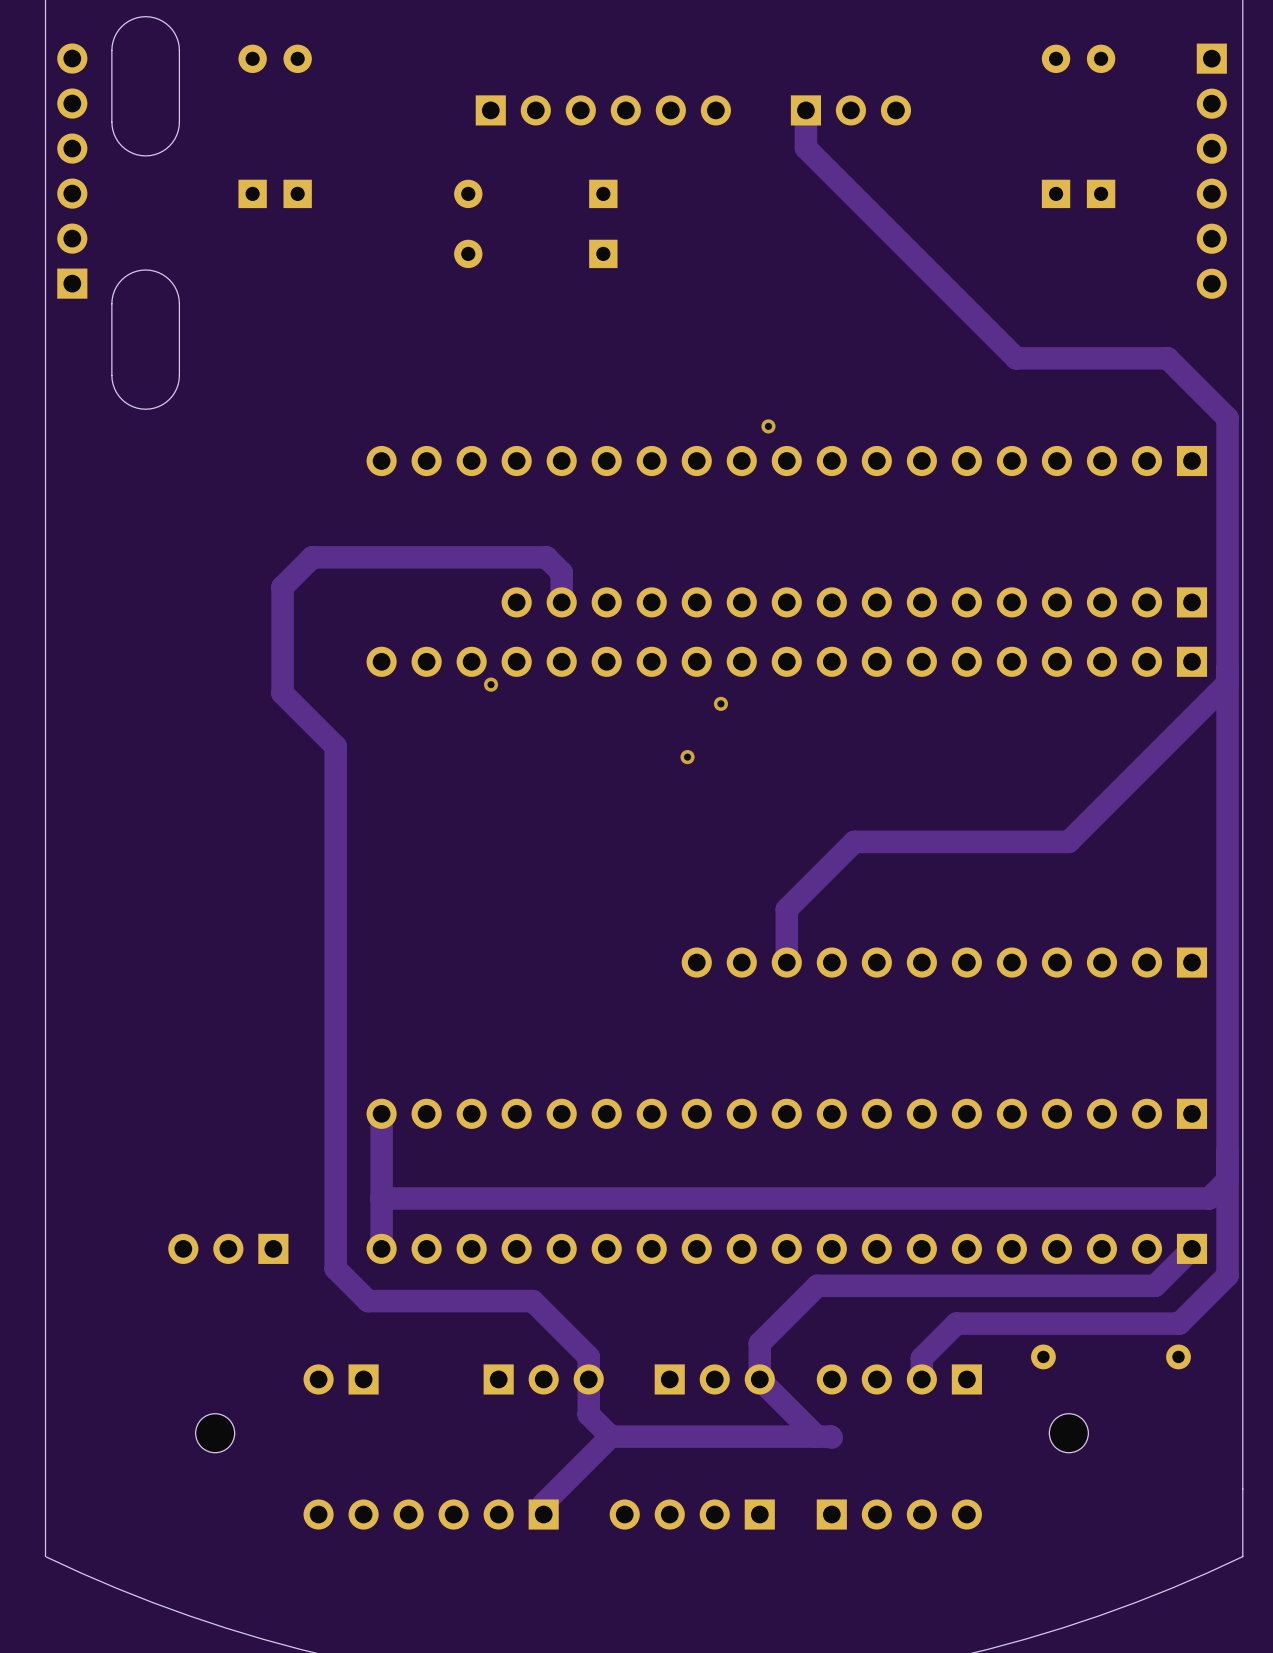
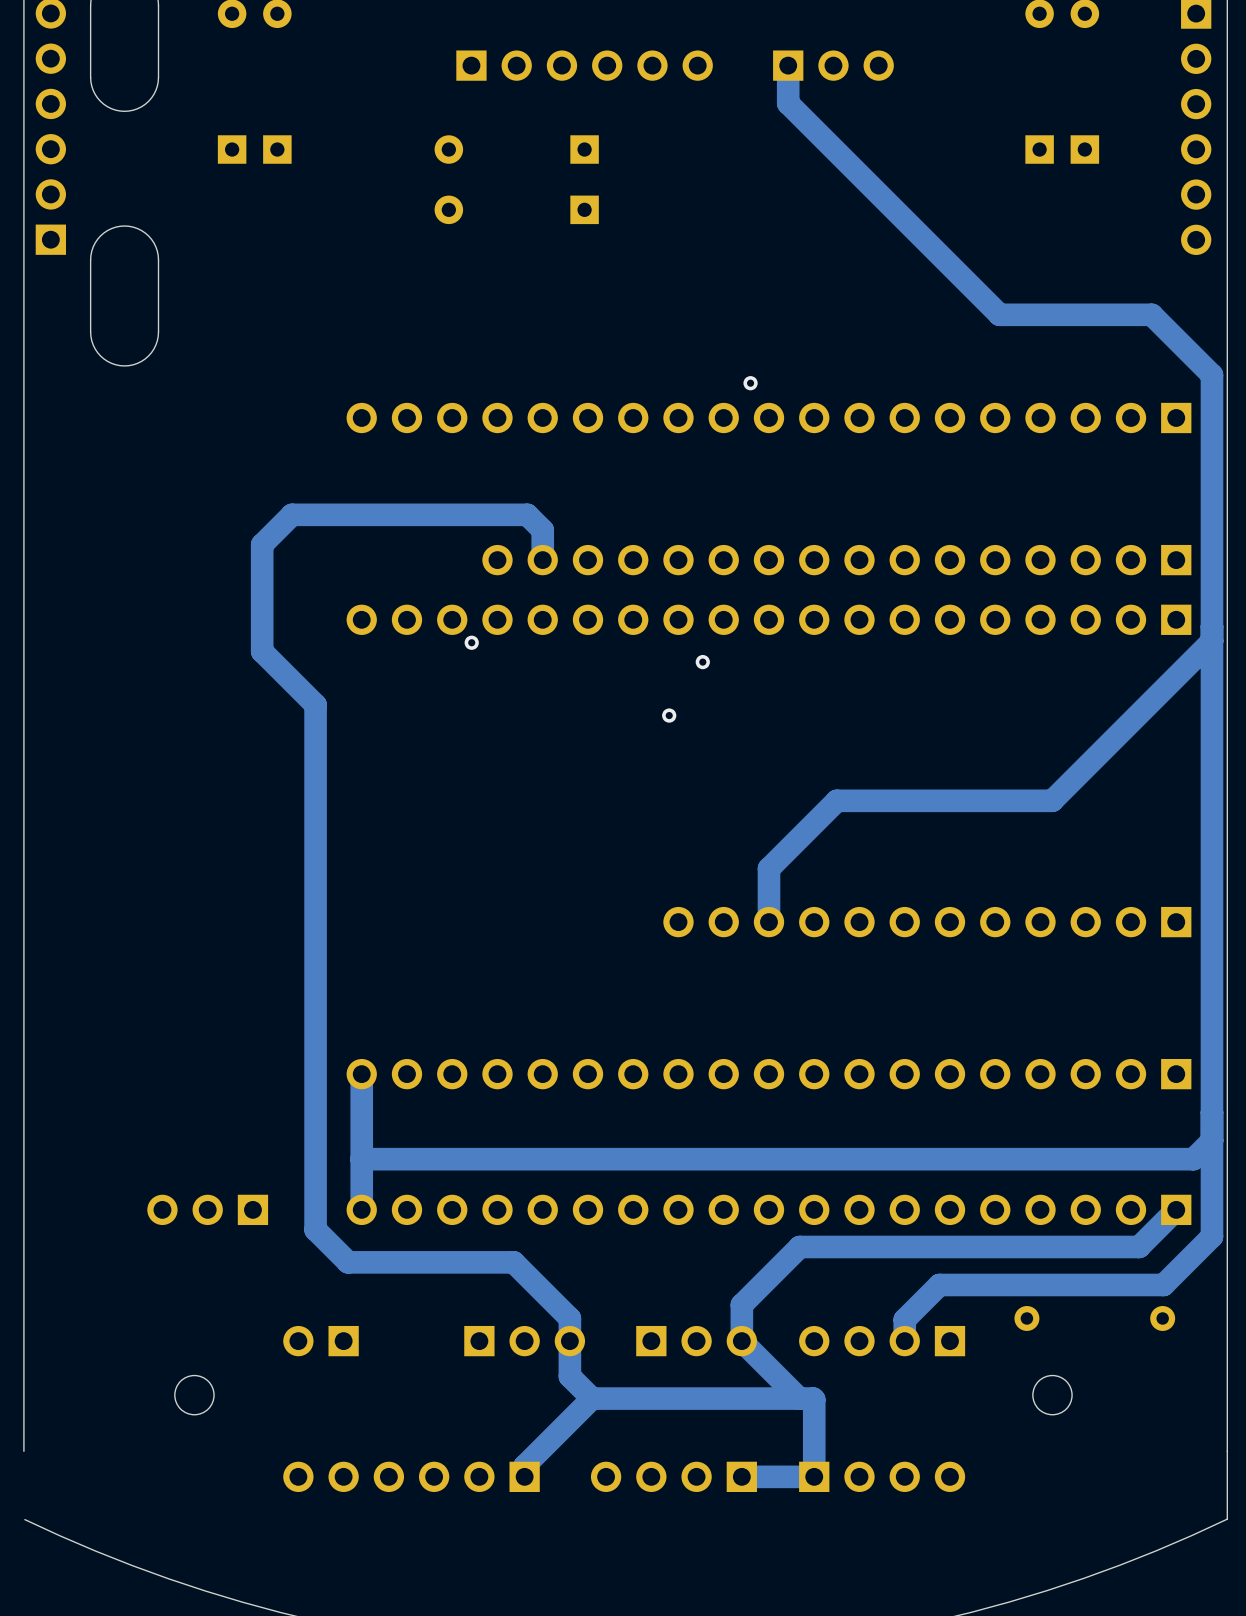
track: none -> (814, 1399) (814, 1476)
board edge: (45, 1489) (45, 1556) -> none
track: none -> (812, 1469) (805, 1476) (741, 1476)

